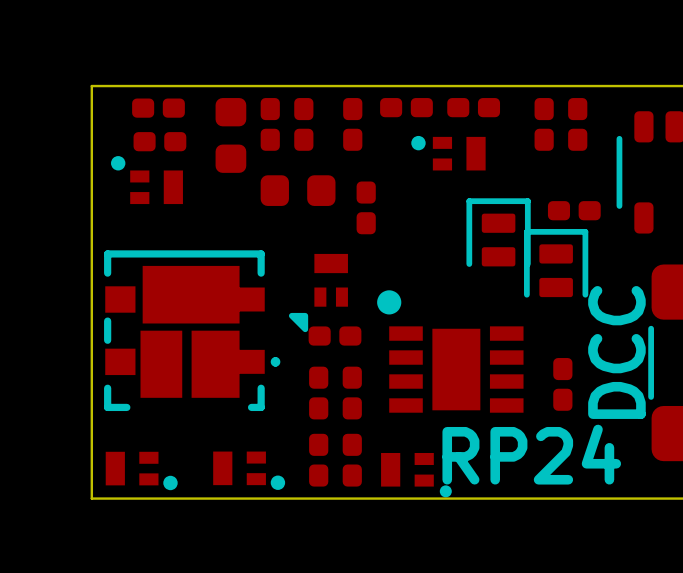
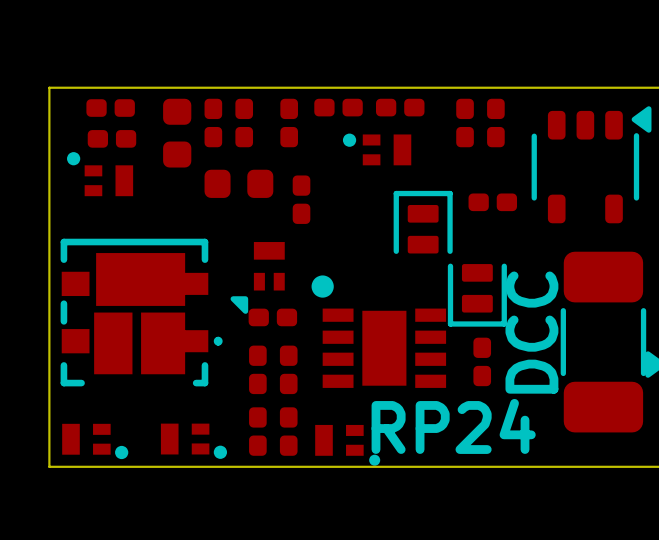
part rotation: 0° (556, 263) -> 180° (477, 295)
part position: (556, 263) -> (477, 295)

